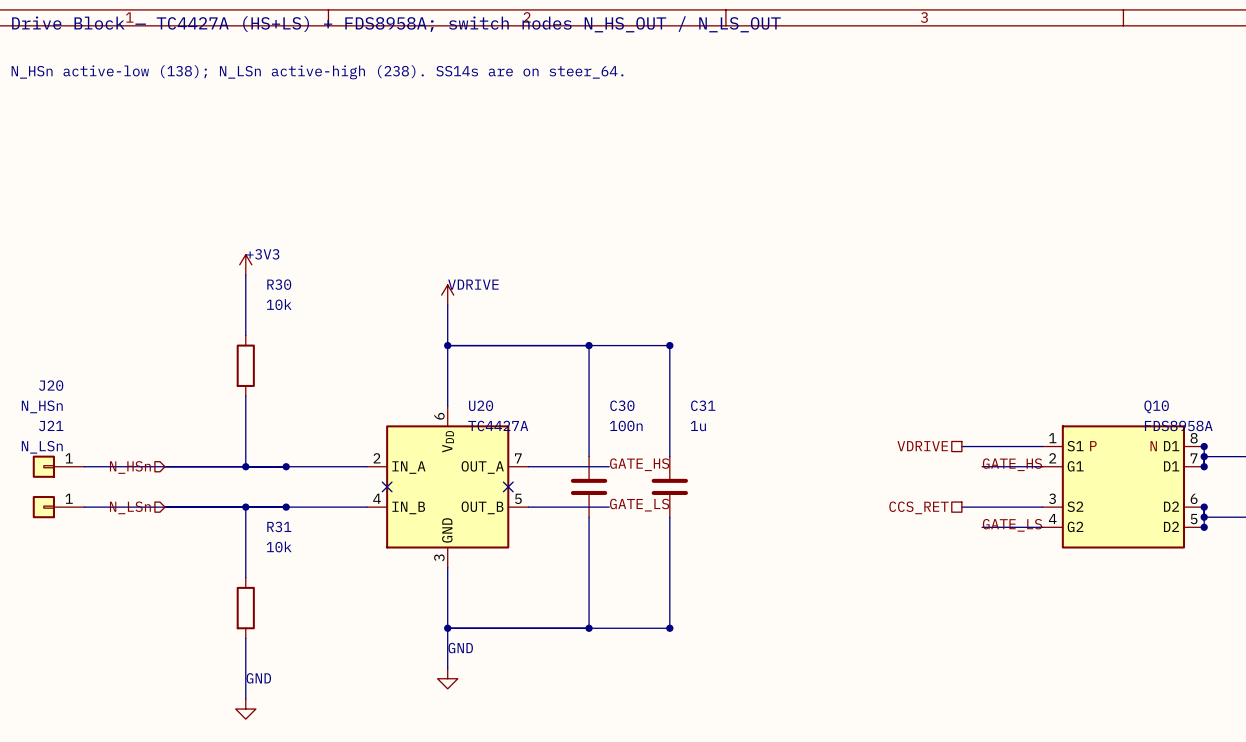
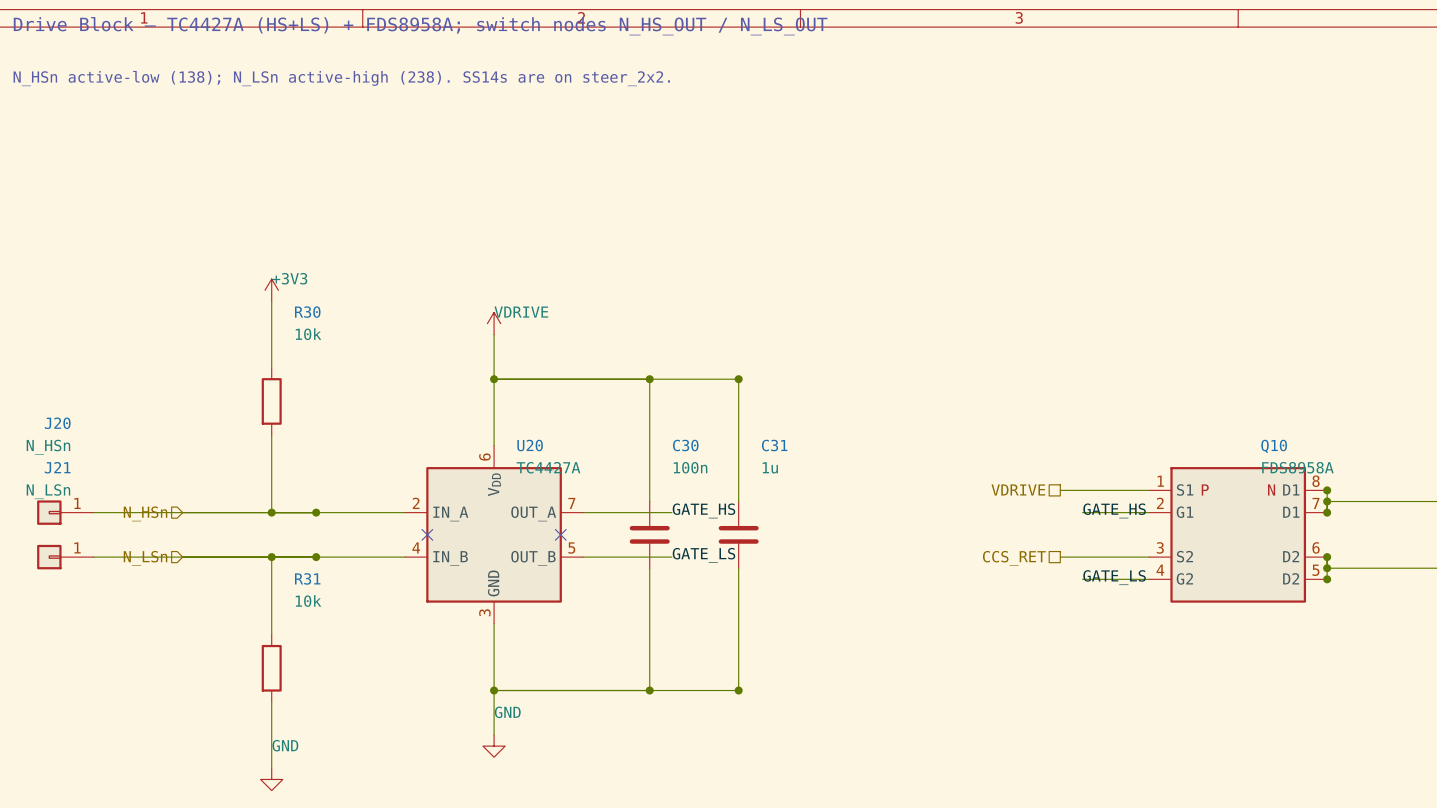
text: N_HSn active-low (138); N_LSn active-high (238). SS14s are on steer_64. (317, 72) -> N_HSn active-low (138); N_LSn active-high (238). SS14s are on steer_2x2. (341, 78)

